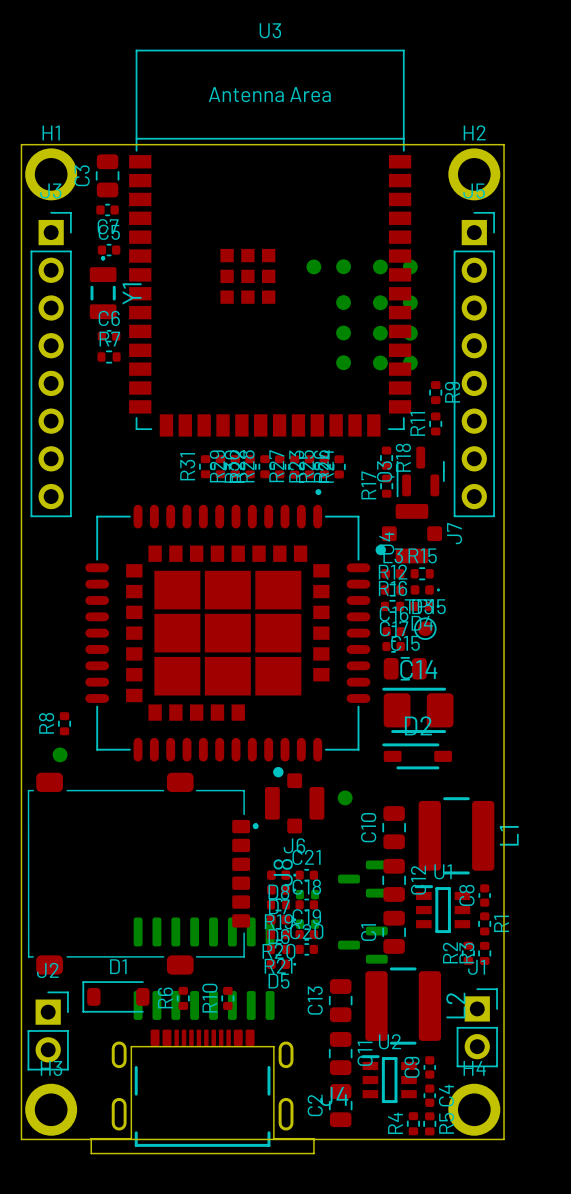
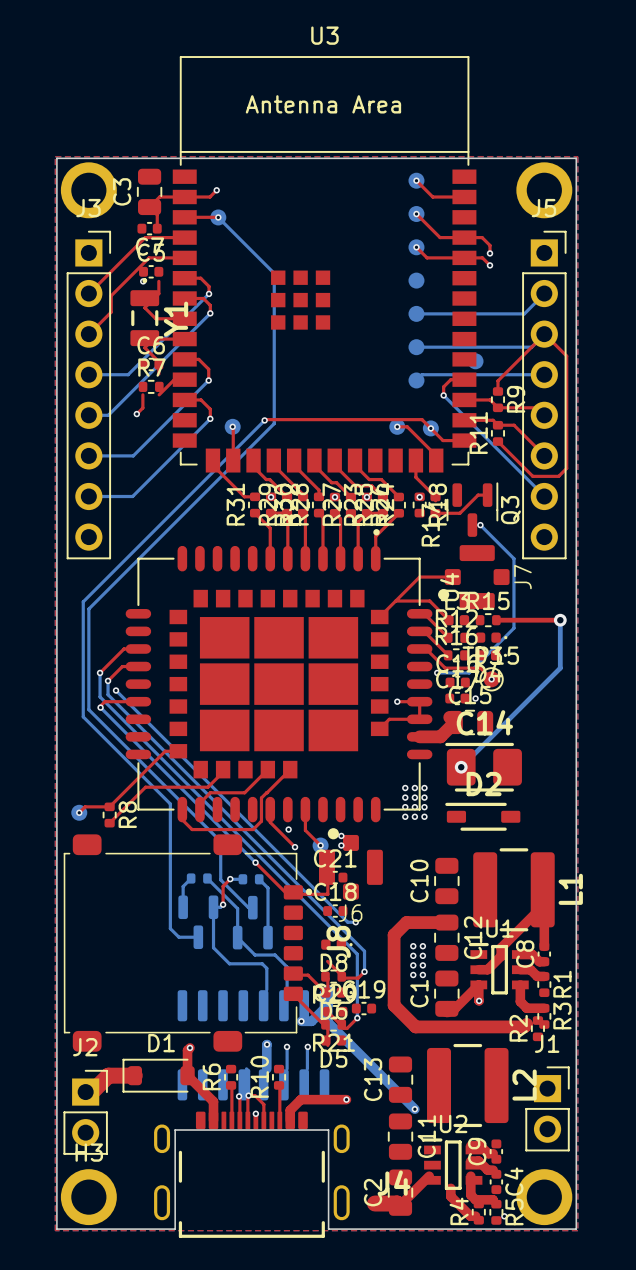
H1 name: H1 (51, 132) -> none
H2 name: H2 (474, 132) -> none
top zone outline: none -> (55, 156) (577, 156) (577, 1230) (55, 1230) (55, 156)
top track: none -> (416, 180) (432, 197) (464, 197)
part: none -> (416, 180)
via: none -> (416, 180)
top track: none -> (216, 190) (210, 197) (159, 197) (149, 207) (157, 214) (157, 228)
via: none -> (216, 190)
top track: none -> (416, 214) (440, 237) (482, 237) (489, 245) (489, 253)
part: none -> (416, 214)
via: none -> (416, 214)
top track: none -> (184, 217) (218, 217)
bottom track: none -> (218, 217) (274, 273) (274, 423) (88, 609) (88, 709) (220, 841) (220, 879) (248, 907) (252, 907)
part: none -> (218, 217)
via: none -> (218, 217)
top track: none -> (184, 237) (145, 237) (89, 293)
top track: none -> (416, 247) (427, 257) (482, 257) (489, 265)
part: none -> (416, 247)
via: none -> (416, 247)
via: none -> (489, 253)
top track: none -> (184, 257) (149, 257) (111, 295) (111, 312) (89, 334)
via: none -> (489, 265)
top track: none -> (184, 278) (200, 278) (209, 286) (209, 293)
part: none -> (416, 280)
via: none -> (143, 281)
top track: none -> (158, 281) (158, 293) (144, 307) (155, 318) (184, 318)
part: (313, 266) -> none
part: (343, 266) -> none
part: (380, 266) -> none
part: (410, 266) -> none
bottom track: none -> (208, 293) (128, 374) (89, 374)
via: none -> (209, 293)
bottom track: none -> (544, 293) (524, 313) (416, 313)
top track: none -> (184, 298) (203, 298) (210, 305) (210, 313)
bottom track: none -> (210, 313) (108, 415) (89, 415)
via: none -> (210, 313)
part: none -> (416, 313)
part: (343, 302) -> none
part: (380, 302) -> none
part: (410, 302) -> none
bottom track: none -> (544, 334) (531, 347) (416, 347)
top track: none -> (184, 339) (153, 339) (144, 347) (158, 361) (158, 374)
part: none -> (416, 347)
top track: none -> (184, 359) (198, 359) (208, 369) (208, 380)
part: (343, 333) -> none
part: (380, 333) -> none
bottom track: none -> (544, 374) (422, 374) (416, 380)
top track: none -> (464, 379) (450, 379) (443, 386) (443, 395)
top track: none -> (183, 380) (174, 379) (159, 394)
bottom track: none -> (208, 380) (133, 455) (89, 455)
via: none -> (208, 380)
part: none -> (416, 380)
top track: none -> (497, 391) (497, 380) (544, 334) (566, 356) (566, 468) (558, 476) (532, 476) (497, 441)
part: (343, 362) -> none
part: (380, 362) -> none
part: (410, 362) -> none
top track: none -> (142, 394) (142, 407) (136, 414)
bottom track: none -> (443, 395) (544, 496)
via: none -> (443, 395)
top track: none -> (179, 399) (201, 399) (210, 409) (210, 418)
top track: none -> (464, 399) (490, 399) (497, 407) (537, 407) (544, 415)
via: none -> (136, 414)
bottom track: none -> (210, 418) (132, 496) (89, 496)
via: none -> (210, 418)
top track: none -> (264, 420) (422, 419) (443, 440) (464, 440)
bottom track: none -> (264, 420) (83, 601) (83, 716) (170, 803) (170, 928) (178, 937) (198, 937)
via: none -> (264, 420)
top track: none -> (464, 420) (493, 420) (497, 425) (514, 425) (544, 455)
R9 position: (435, 392) -> (497, 399)
top track: none -> (232, 426) (233, 460)
part: none -> (232, 426)
via: none -> (232, 426)
top track: none -> (397, 426) (407, 426) (436, 455) (436, 460)
part: none -> (397, 426)
via: none -> (397, 426)
part: none -> (430, 428)
via: none -> (430, 428)
R11 position: (435, 423) -> (497, 433)
top track: none -> (212, 460) (212, 465) (244, 496) (255, 496)
top track: none -> (253, 460) (253, 466) (287, 496)
top track: none -> (273, 460) (273, 465) (303, 494) (303, 496)
top track: none -> (294, 460) (294, 465) (318, 490) (318, 496)
top track: none -> (314, 460) (314, 465) (331, 482) (336, 482) (350, 497)
top track: none -> (334, 460) (334, 465) (355, 485) (371, 485) (382, 496)
top track: none -> (355, 460) (355, 465) (369, 479) (381, 479) (398, 496)
top track: none -> (415, 460) (415, 477) (435, 496)
top track: none -> (487, 495) (478, 495) (459, 513) (435, 513)
R18 position: (386, 458) -> (419, 504)
via: none -> (271, 497)
via: none -> (334, 497)
via: none -> (366, 497)
via: none -> (419, 497)
Q3 rotation: 0° (420, 471) -> 180° (472, 509)
top track: none -> (255, 513) (270, 528) (270, 558)
top track: none -> (271, 513) (287, 513) (287, 558)
top track: none -> (303, 513) (305, 515) (305, 558)
top track: none -> (318, 513) (322, 517) (322, 558)
top track: none -> (334, 513) (340, 518) (340, 558)
top track: none -> (382, 513) (366, 513) (358, 522) (358, 558)
top track: none -> (398, 513) (375, 536) (375, 558)
bottom track: none -> (480, 525) (513, 558) (513, 628) (469, 672) (437, 672)
via: none -> (480, 525)
R17 position: (386, 486) -> (435, 505)
top track: none -> (452, 577) (419, 577) (379, 617)
top track: none -> (395, 601) (429, 601) (448, 620)
top track: none -> (419, 613) (424, 613) (448, 637)
top track: none -> (496, 620) (560, 620)
bottom track: none -> (560, 620) (560, 668) (461, 767)
via: none -> (560, 620)
top track: none -> (419, 631) (424, 631) (448, 655)
top track: none -> (138, 648) (124, 648) (100, 672)
top track: none -> (419, 648) (426, 648) (445, 668) (480, 668) (491, 679)
top track: none -> (138, 666) (122, 666) (108, 680)
bottom track: none -> (100, 672) (100, 696) (357, 954) (357, 1018)
via: none -> (100, 672)
via: none -> (437, 672)
via: none -> (491, 679)
bottom track: none -> (108, 680) (108, 694) (364, 951) (364, 971)
via: none -> (108, 680)
bottom track: none -> (116, 690) (347, 922) (355, 922)
via: none -> (116, 690)
via: none -> (475, 698)
top track: none -> (138, 701) (104, 701) (100, 707)
top track: none -> (397, 701) (419, 701) (419, 719) (389, 719) (379, 728)
via: none -> (397, 701)
bottom track: none -> (100, 707) (255, 862)
via: none -> (100, 707)
top track: none -> (449, 717) (454, 722) (440, 736) (419, 736)
top track: none -> (178, 754) (178, 751) (165, 751) (109, 806) (85, 806) (79, 812)
via: none -> (461, 767)
top track: none -> (223, 769) (223, 772) (208, 787) (145, 787) (109, 823)
top track: none -> (267, 769) (244, 792) (210, 792) (199, 803) (199, 815)
top track: none -> (290, 769) (261, 797) (261, 821) (253, 829) (192, 829) (182, 819) (182, 803)
R8 name position: R8 (46, 723) -> R8 (127, 814)
R8 position: (64, 723) -> (109, 815)
via: none -> (405, 788)
via: none -> (414, 788)
via: none -> (424, 788)
via: none -> (405, 797)
via: none -> (414, 797)
via: none -> (424, 797)
via: none -> (405, 807)
via: none -> (414, 807)
via: none -> (424, 807)
top track: none -> (270, 809) (270, 822) (295, 847)
top track: none -> (305, 809) (305, 830) (320, 845)
via: none -> (79, 812)
part position: (60, 754) -> (79, 812)
via: none -> (405, 816)
via: none -> (414, 816)
via: none -> (424, 816)
via: none -> (288, 829)
via: none -> (341, 835)
via: none -> (320, 845)
via: none -> (341, 845)
via: none -> (295, 847)
part position: (345, 797) -> (320, 845)
top track: none -> (255, 862) (286, 893) (327, 894) (327, 877)
via: none -> (255, 862)
bottom track: none -> (191, 878) (183, 886) (183, 907)
part: none -> (199, 878)
bottom track: none -> (207, 878) (237, 908) (237, 937) (255, 955) (275, 955) (287, 967) (287, 989)
top track: none -> (230, 879) (223, 886) (223, 904)
bottom track: none -> (230, 879) (242, 879)
via: none -> (230, 879)
part: none -> (251, 879)
bottom track: none -> (259, 879) (268, 888) (268, 937)
C10 position: (394, 827) -> (446, 881)
L1 position: (456, 835) -> (513, 889)
bottom track: none -> (223, 904) (220, 907) (213, 907) (213, 947) (229, 963) (262, 963) (266, 968) (266, 989)
via: none -> (223, 904)
part: none -> (198, 922)
part: none -> (252, 922)
via: none -> (355, 922)
top track: none -> (446, 922) (406, 922) (394, 935) (394, 1005) (415, 1026) (524, 1026) (526, 1024)
C21 position: (306, 875) -> (335, 877)
via: none -> (413, 946)
via: none -> (422, 946)
top track: none -> (544, 946) (544, 891) (542, 889) (542, 906) (501, 947) (501, 956) (487, 969) (478, 969)
part: (362, 879) -> none
C12 position: (394, 880) -> (446, 937)
top track: none -> (520, 954) (532, 954) (539, 961) (544, 961)
via: none -> (413, 955)
via: none -> (422, 955)
top track: none -> (327, 961) (343, 978) (358, 978) (364, 971)
D7: (281, 890) -> none
part: (307, 894) -> none
via: none -> (413, 965)
via: none -> (422, 965)
C8 position: (484, 895) -> (544, 954)
top track: none -> (520, 969) (530, 969) (537, 976) (544, 976)
via: none -> (364, 971)
top track: none -> (296, 975) (308, 975) (327, 995) (327, 978)
via: none -> (413, 974)
via: none -> (422, 974)
C18 position: (306, 904) -> (335, 911)
U1 position: (442, 909) -> (498, 968)
top track: none -> (520, 984) (520, 1001) (526, 1008) (544, 1008)
bottom track: none -> (327, 989) (327, 1022) (414, 1109)
top track: none -> (296, 995) (327, 1028) (327, 1045)
R1 position: (484, 923) -> (544, 984)
part: (307, 924) -> none
top track: none -> (479, 1000) (478, 984) (454, 1008) (447, 1009)
via: none -> (479, 1000)
bottom track: none -> (327, 1005) (311, 1021) (301, 1021)
C1 position: (394, 932) -> (446, 993)
R20: (278, 934) -> none
top track: none -> (327, 1011) (343, 1028) (347, 1028) (357, 1018)
via: none -> (357, 1018)
part: (362, 945) -> none
via: none -> (301, 1021)
C20 position: (306, 949) -> (335, 1011)
R3 name position: R3 (466, 953) -> R3 (562, 1016)
R3 position: (484, 953) -> (544, 1016)
bottom track: none -> (267, 1044) (266, 1068)
via: none -> (267, 1044)
bottom track: none -> (287, 1046) (287, 1068)
via: none -> (287, 1046)
bottom track: none -> (307, 1046) (307, 1068)
via: none -> (307, 1046)
top track: none -> (189, 1047) (187, 1050) (187, 1075) (213, 1101) (213, 1120)
via: none -> (189, 1047)
bottom track: none -> (246, 1068) (248, 1070) (248, 1095)
top track: none -> (134, 1075) (108, 1075) (92, 1092)
top track: none -> (231, 1085) (231, 1120)
top track: none -> (279, 1085) (279, 1120)
J4 footprint: [90, 1015, 315, 1154] -> [154, 1096, 350, 1238]
via: none -> (248, 1095)
top track: none -> (239, 1096) (239, 1120)
via: none -> (239, 1096)
top track: none -> (346, 1099) (300, 1099) (290, 1110) (290, 1120)
via: none -> (346, 1099)
via: none -> (414, 1109)
via: none -> (255, 1113)
top track: none -> (247, 1120) (248, 1095) (255, 1095) (263, 1104) (263, 1120)
top track: none -> (470, 1145) (480, 1145) (488, 1153) (493, 1153)
H4 name: H4 (474, 1068) -> none
top track: none -> (470, 1161) (478, 1161) (487, 1170) (493, 1170)
top track: none -> (429, 1176) (401, 1203) (397, 1203)
top track: none -> (470, 1176) (470, 1195) (475, 1199) (493, 1199)
top track: none -> (450, 1188) (450, 1196) (470, 1216) (475, 1216)
top track: none -> (374, 1203) (397, 1203)
via: none -> (504, 1216)
board edge: (131, 1139) (273, 1139) -> none

